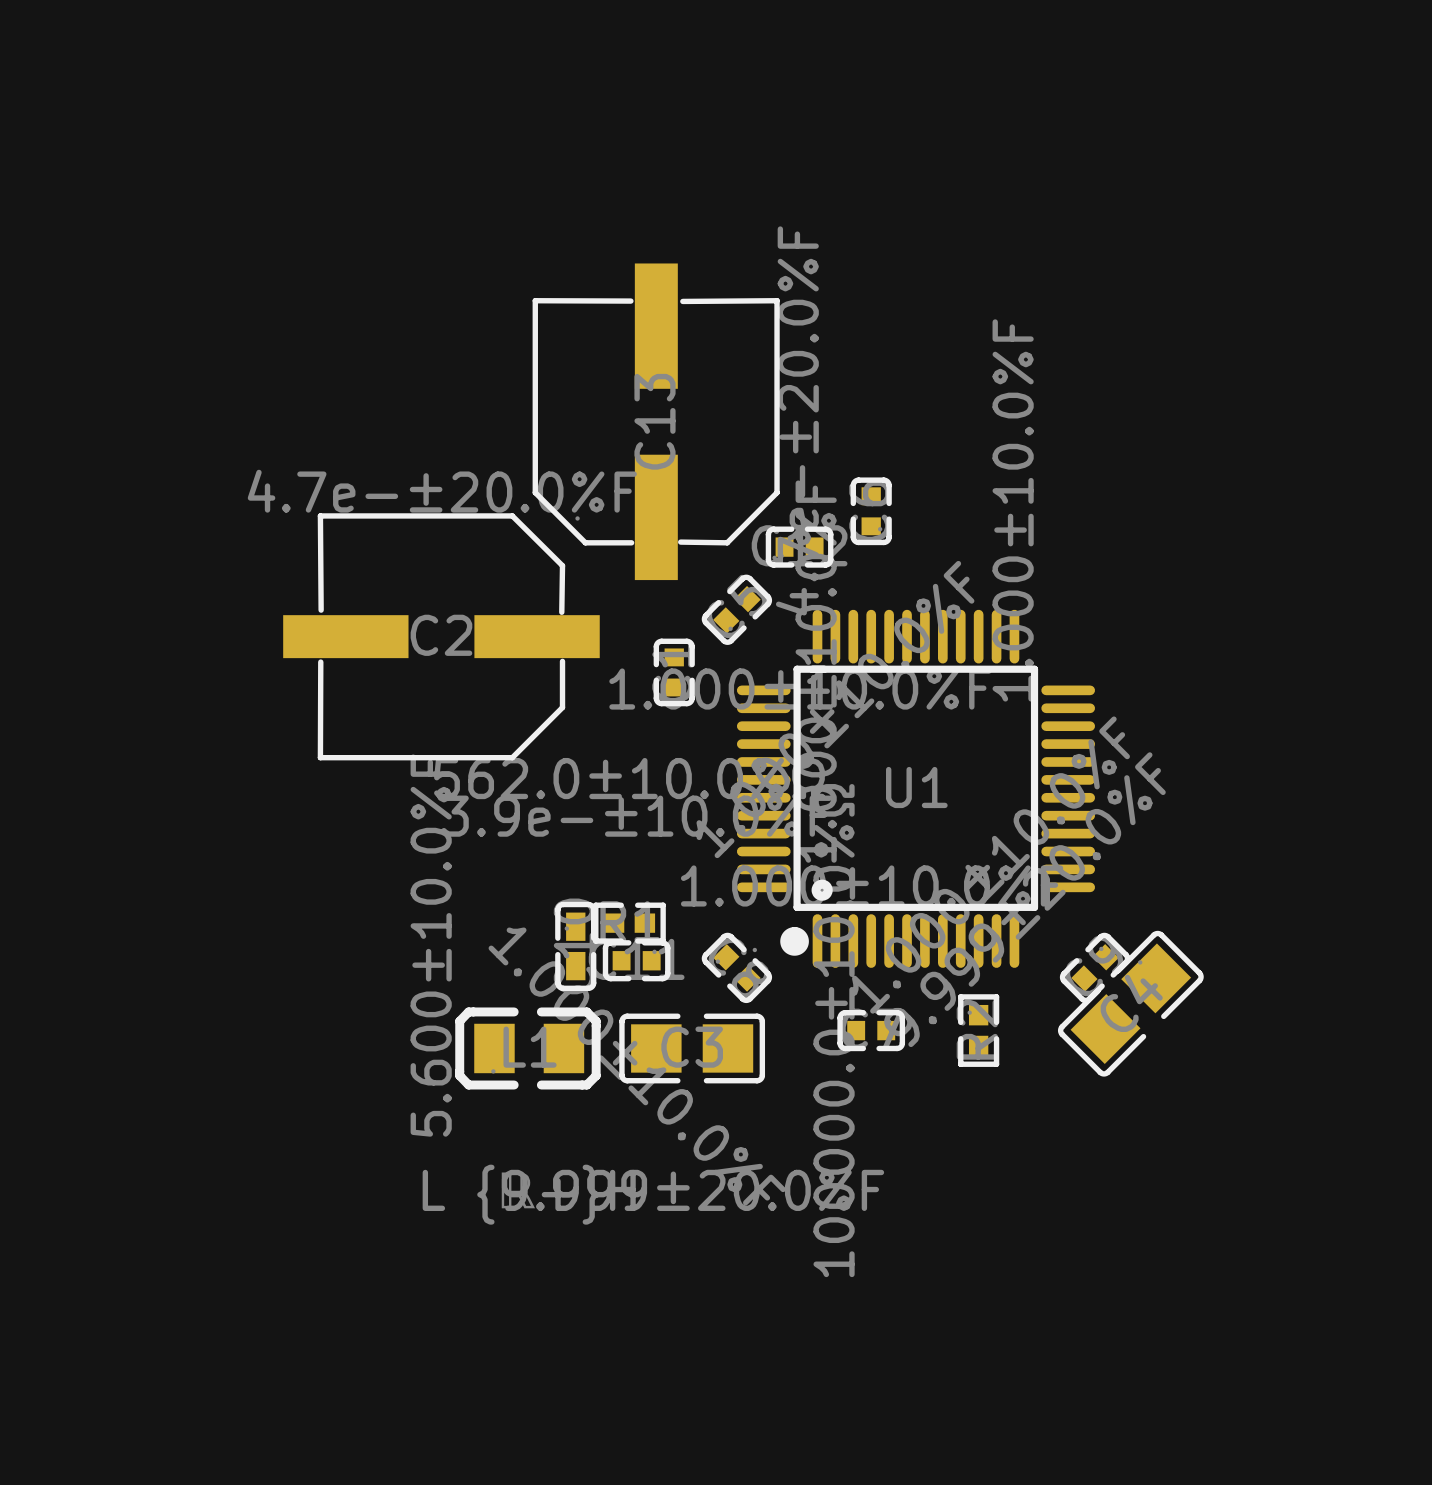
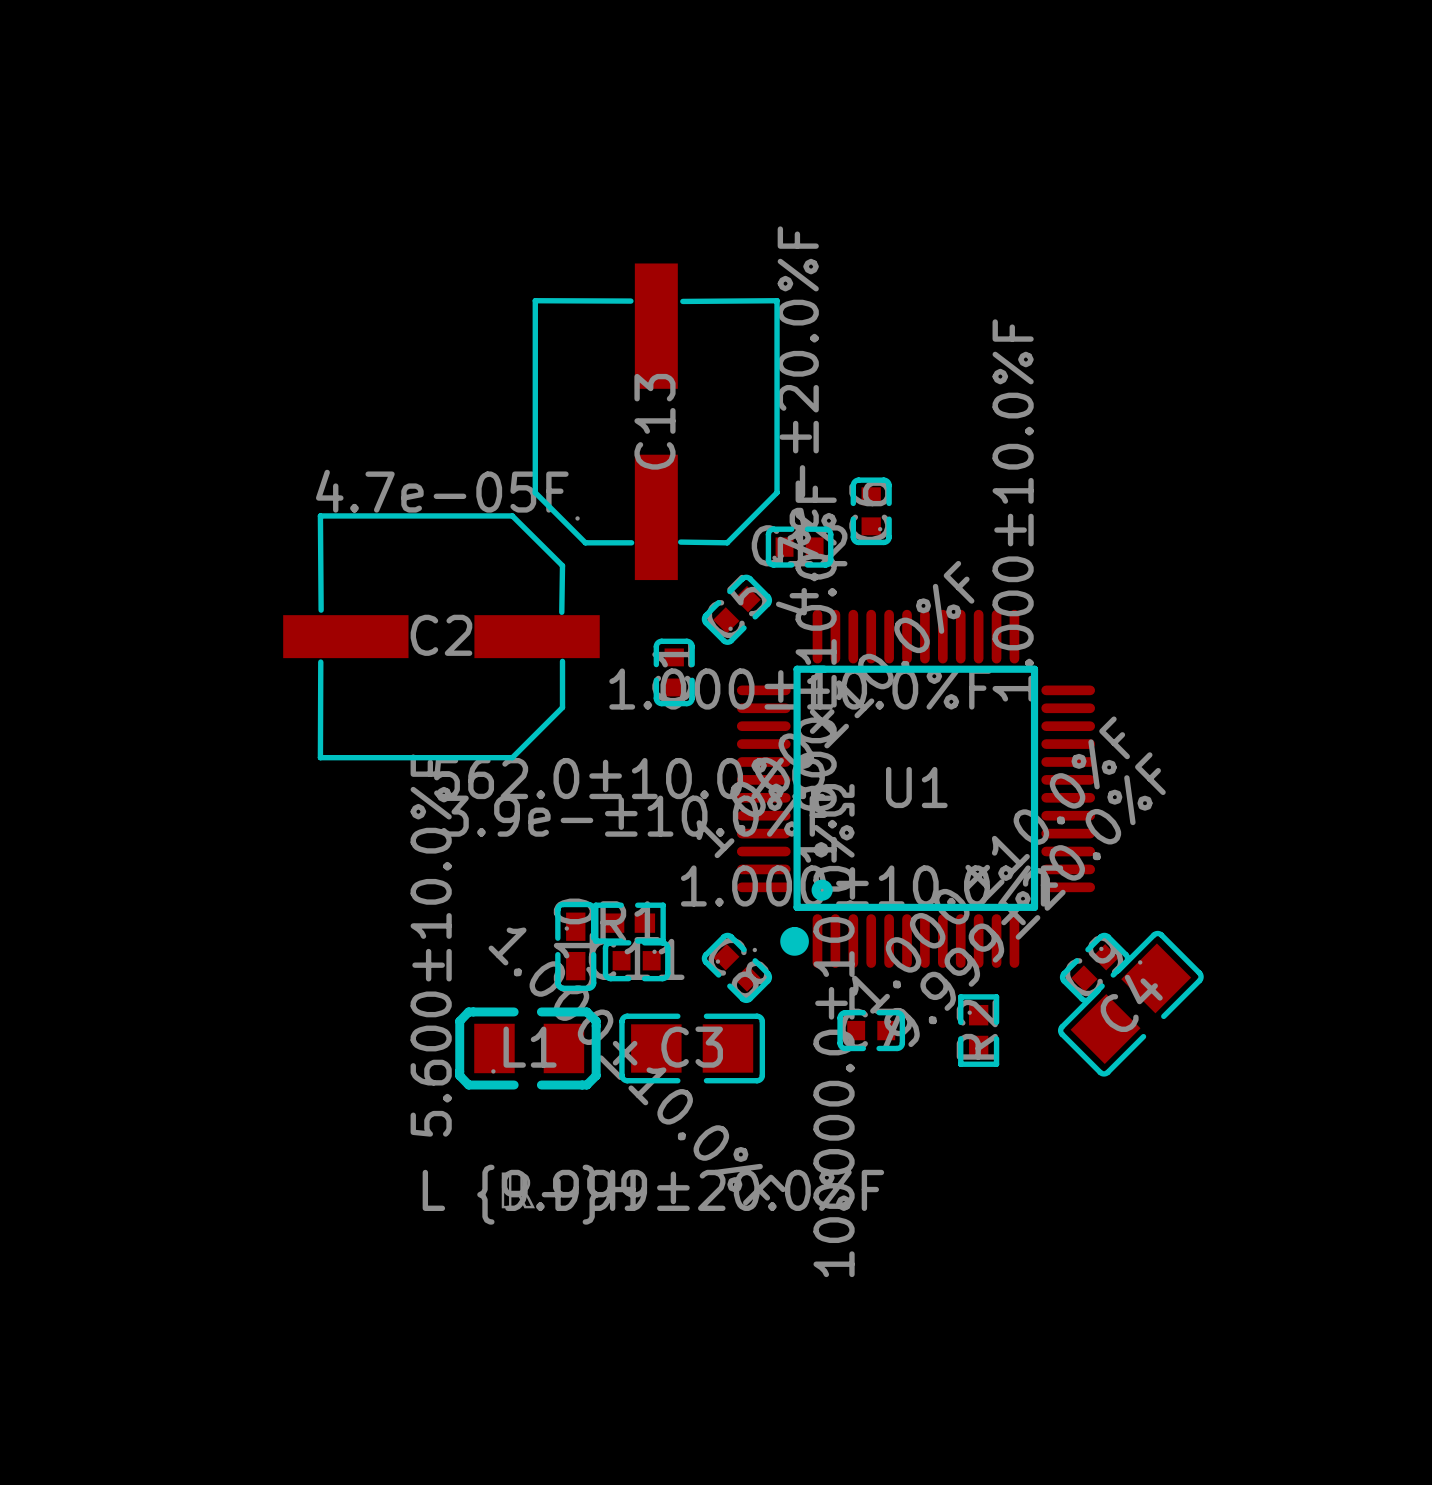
C2 value: 4.7e-±20.0%F (442, 491) -> 4.7e-05F (442, 491)

